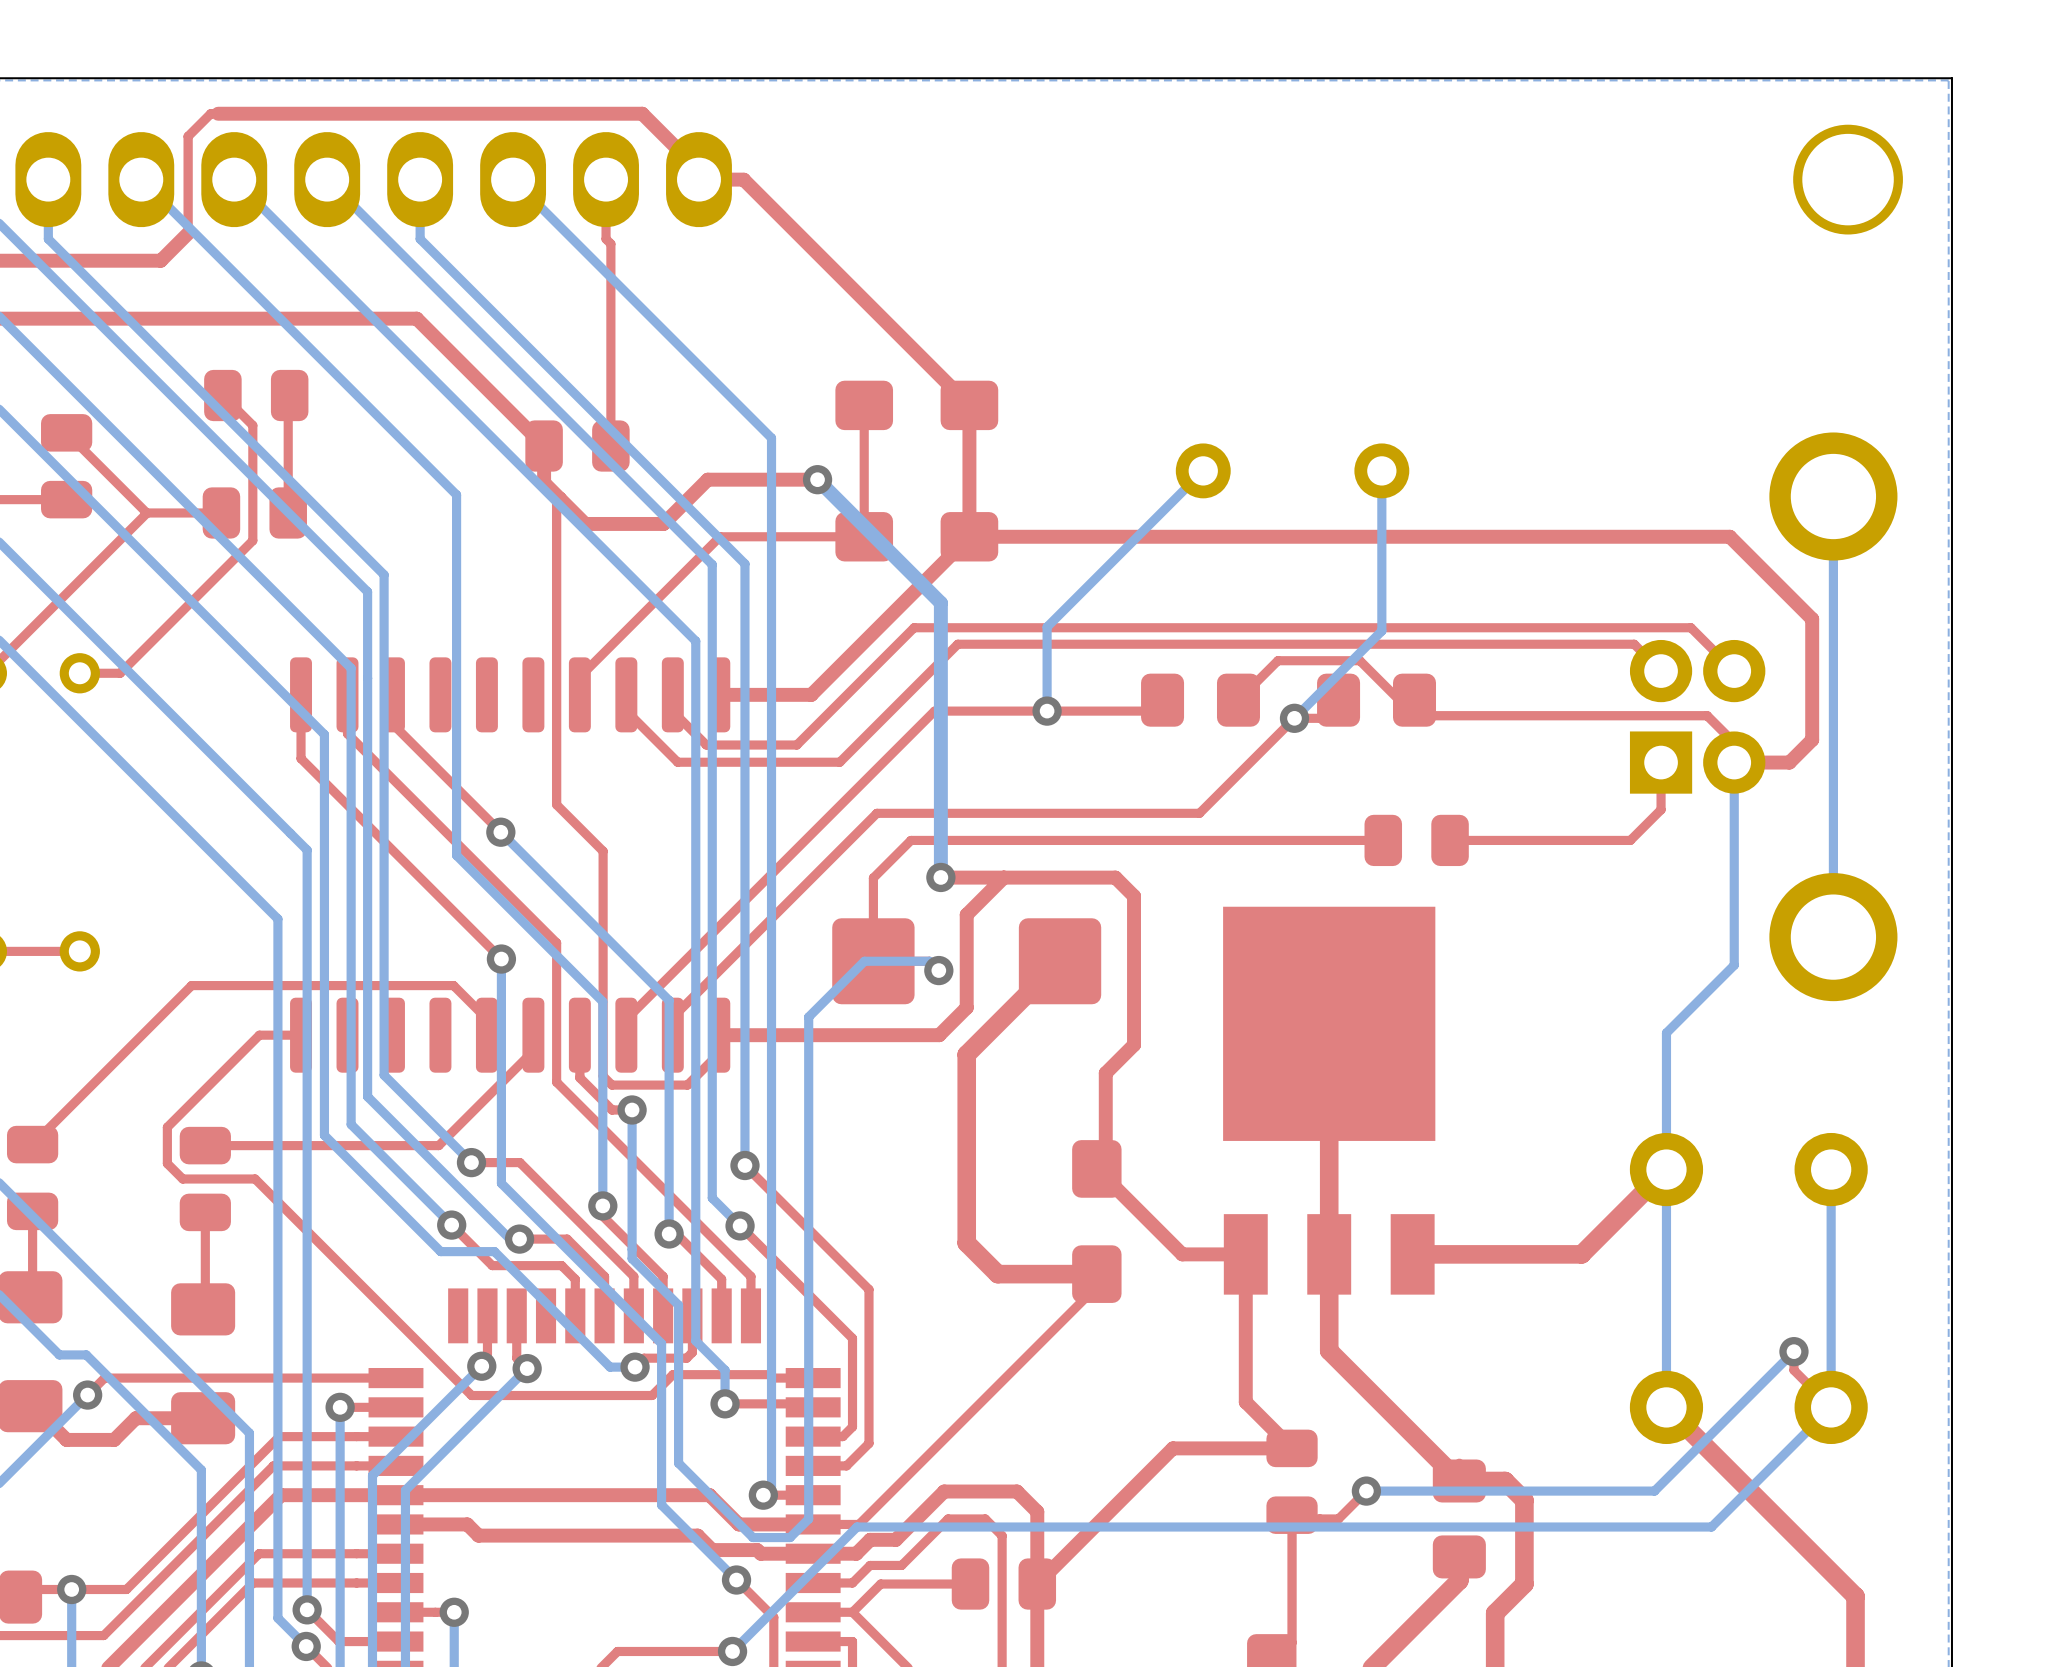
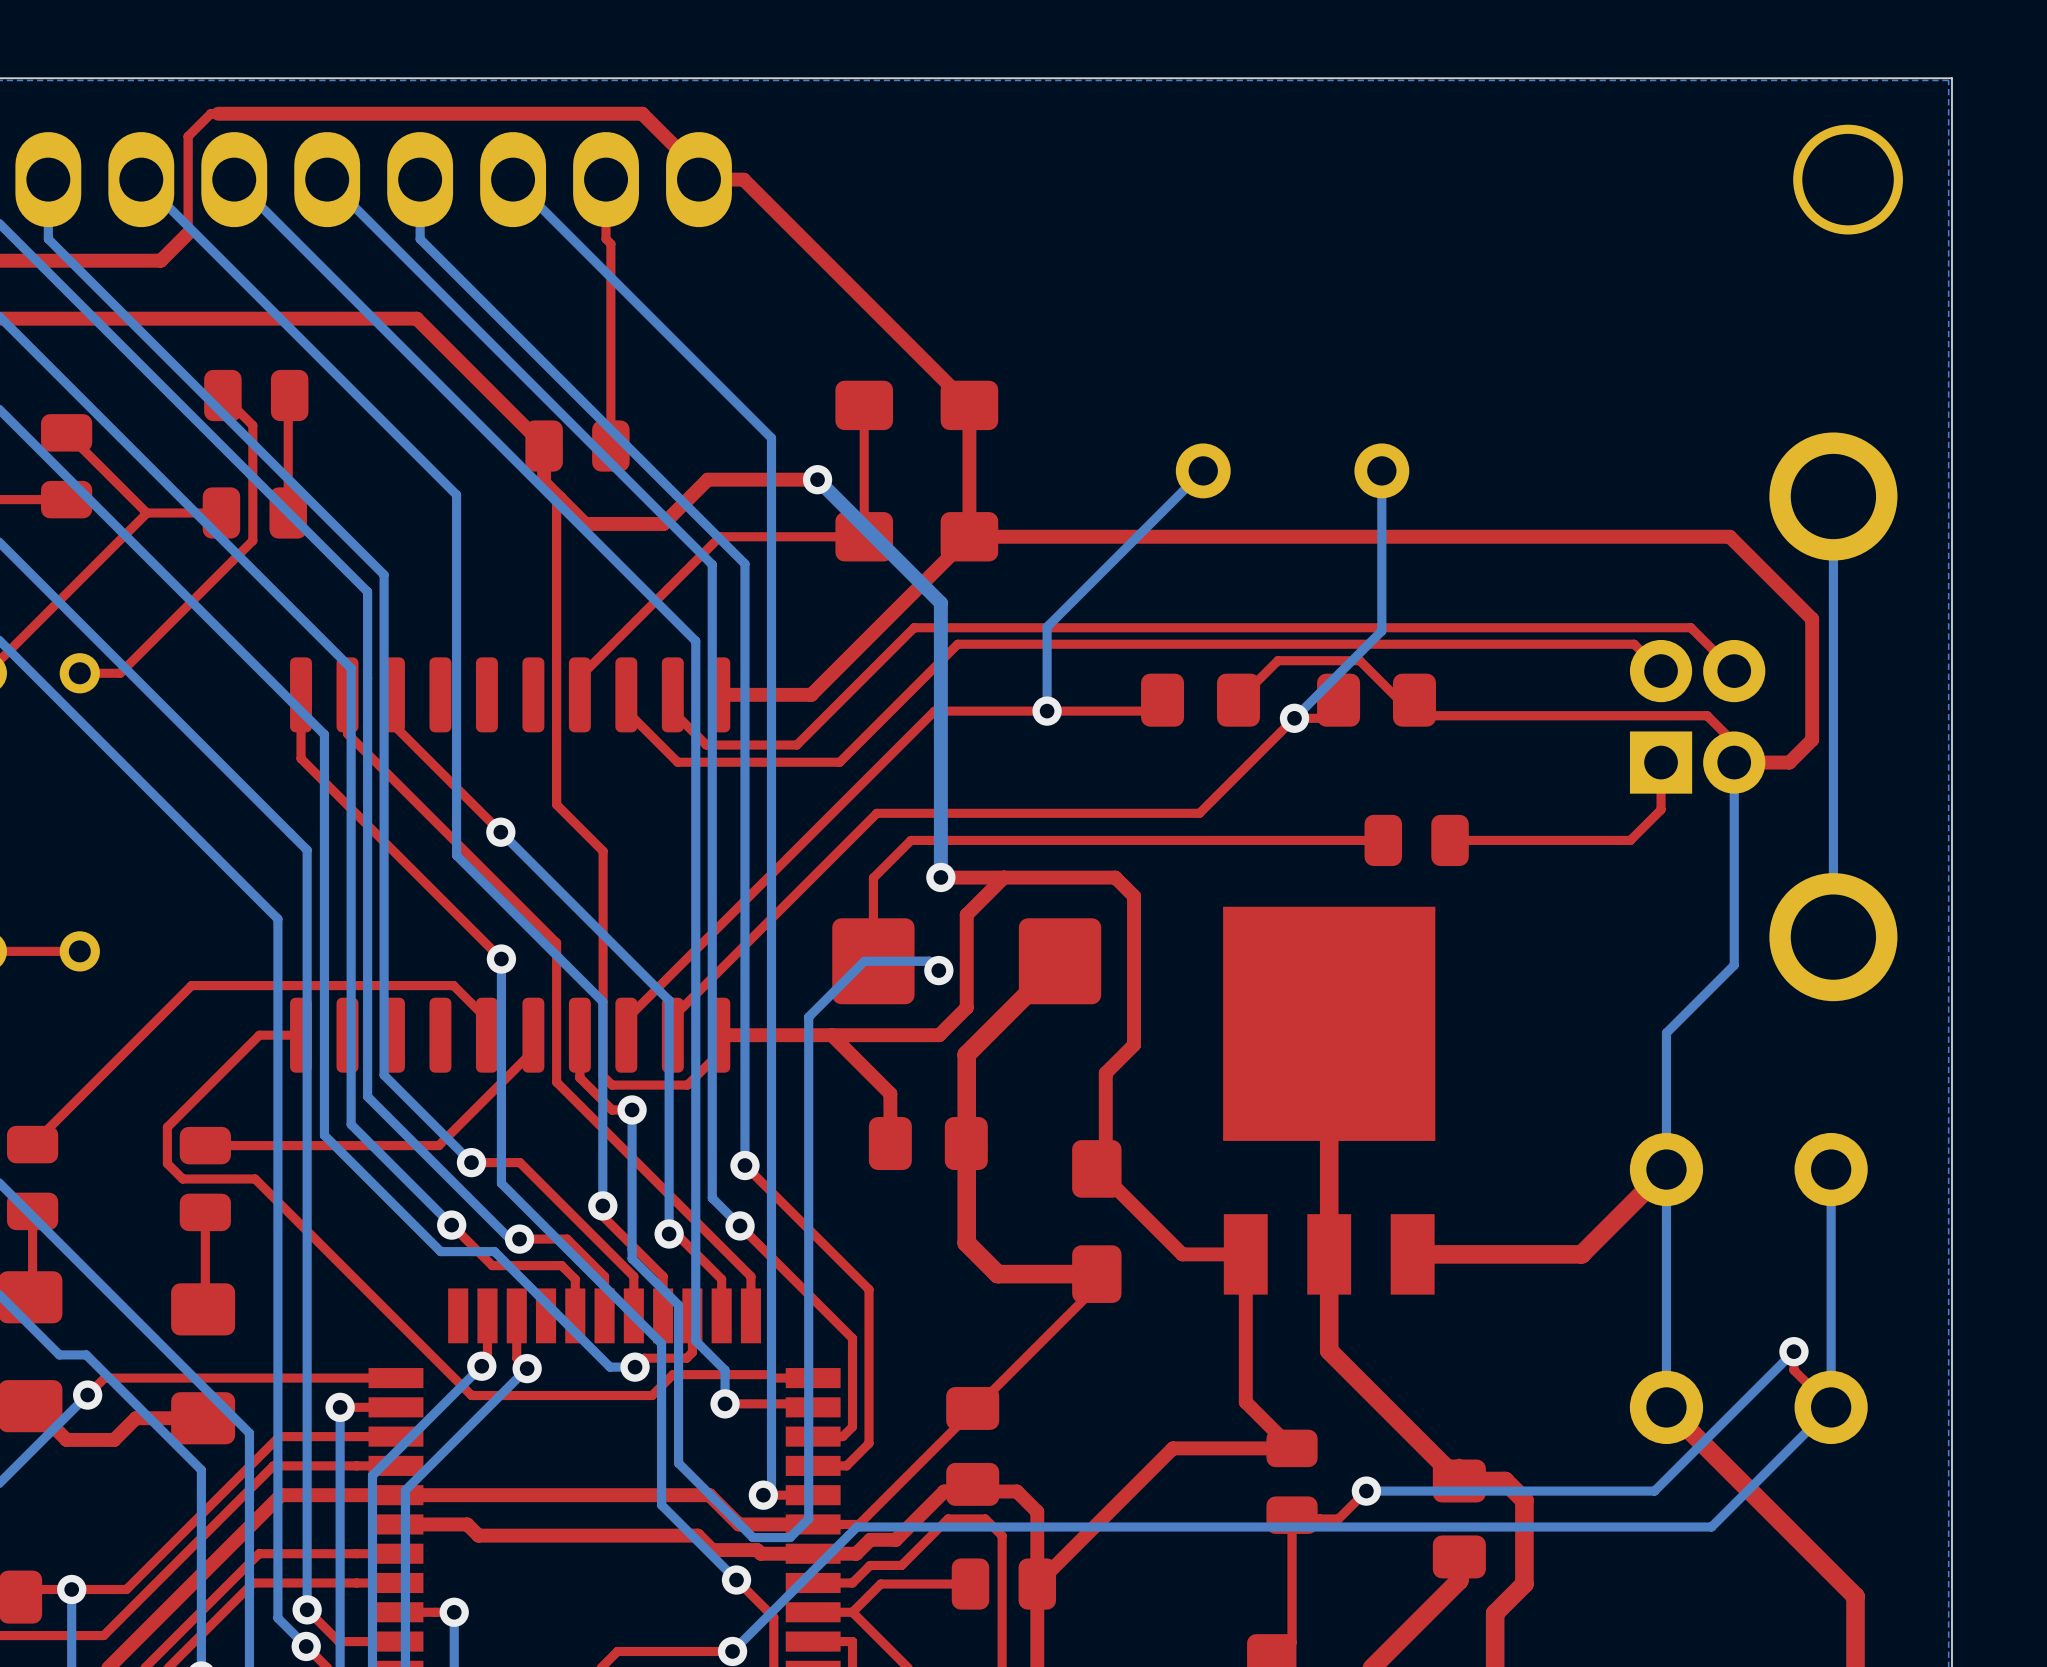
top track: none -> (831, 1035) (890, 1093) (890, 1143)
part: none -> (928, 1143)
part: none -> (972, 1446)

